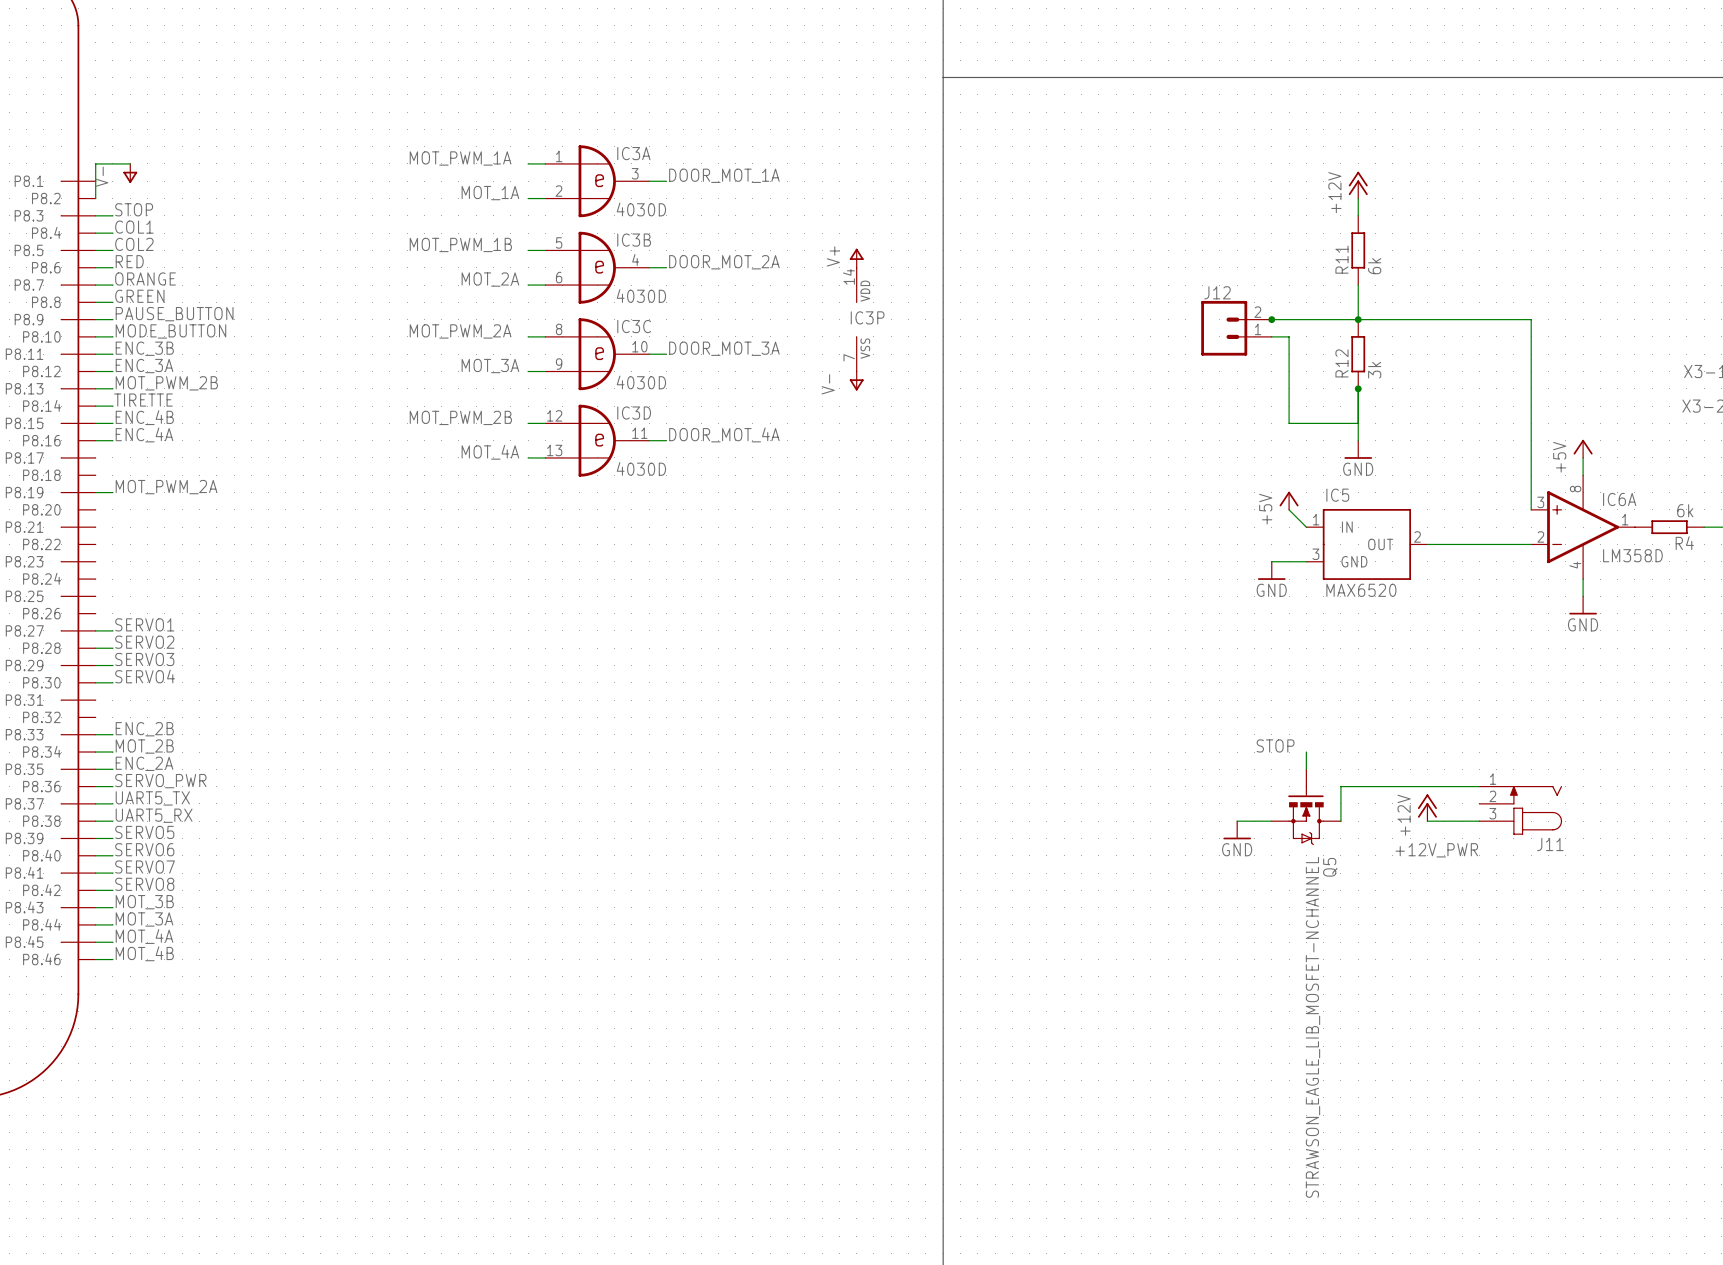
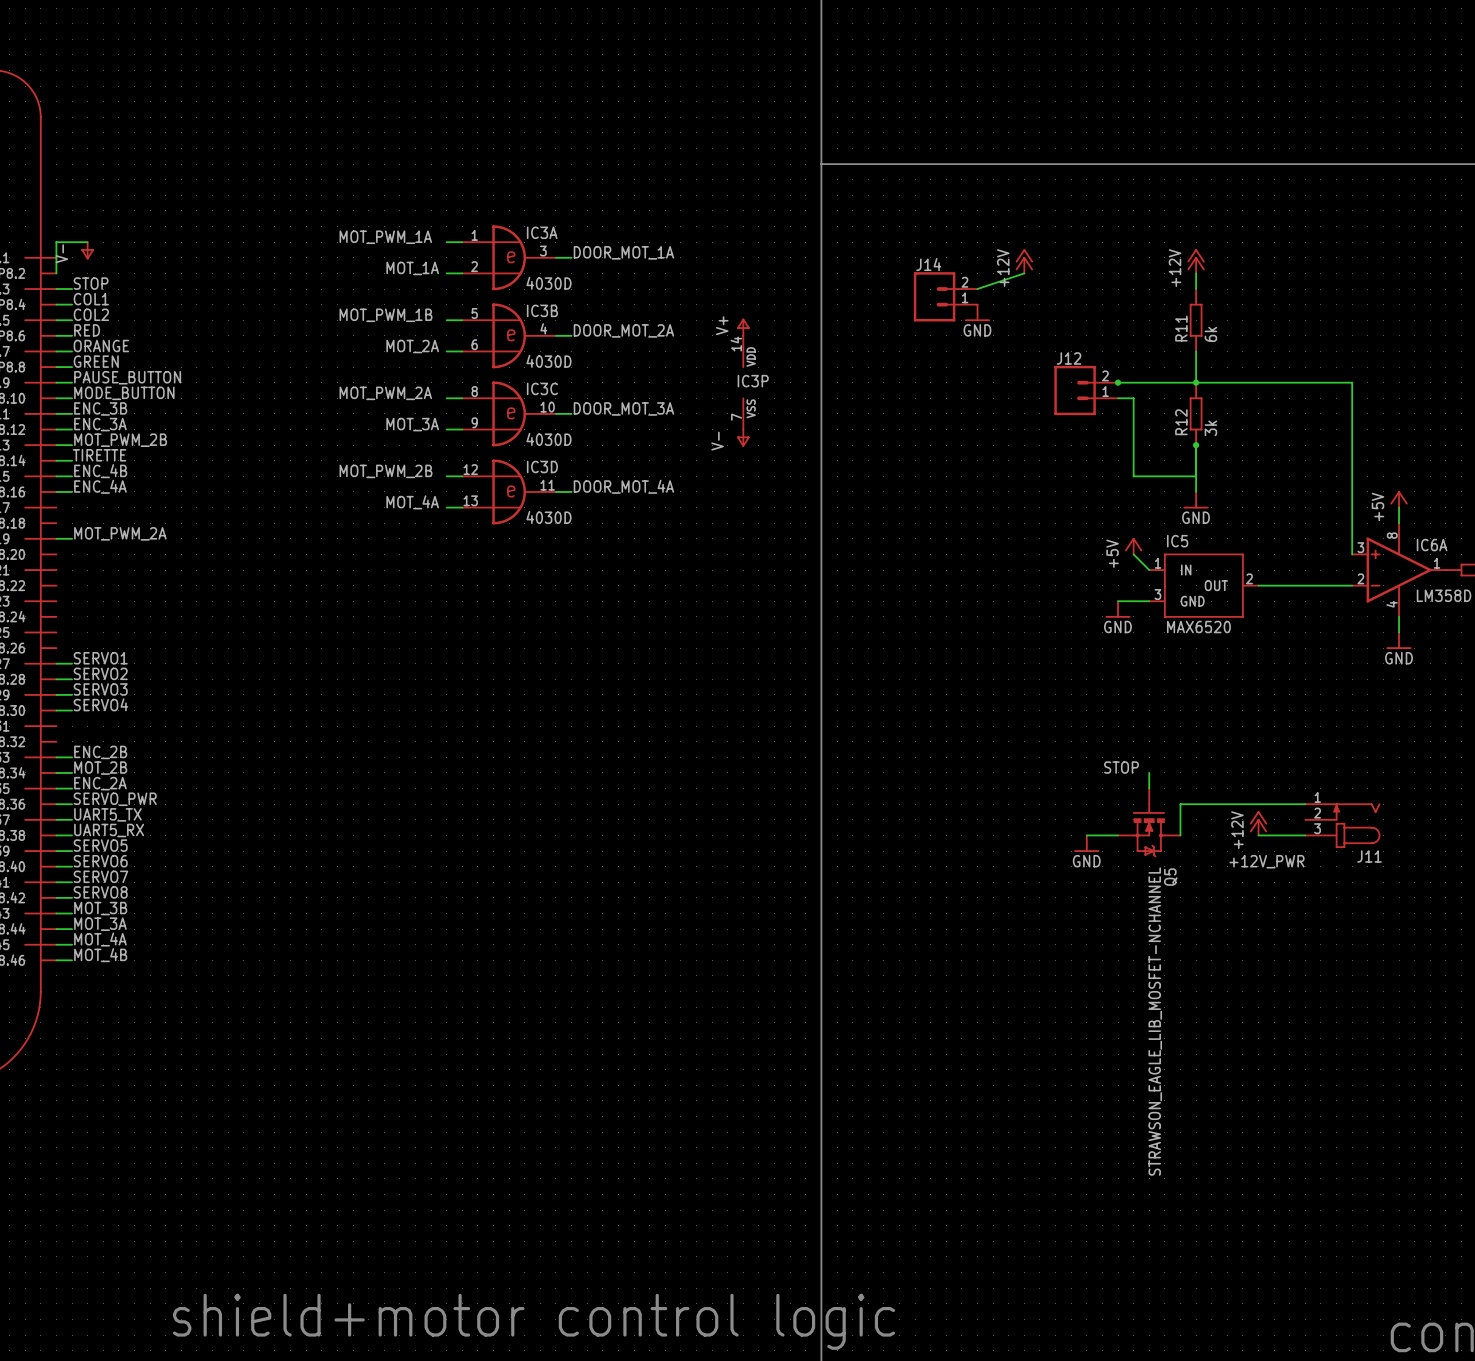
power symbol: none -> +12V (1024, 261)
wire: none -> (1024, 273) (977, 289)
J14: none -> (945, 296)
power symbol: none -> GND (977, 312)

